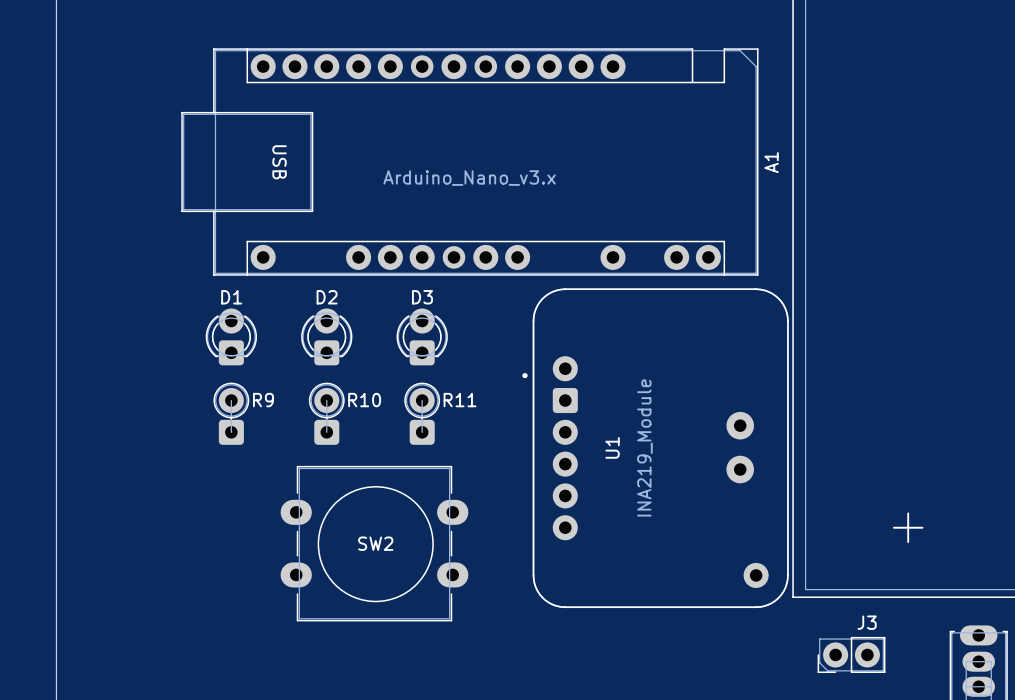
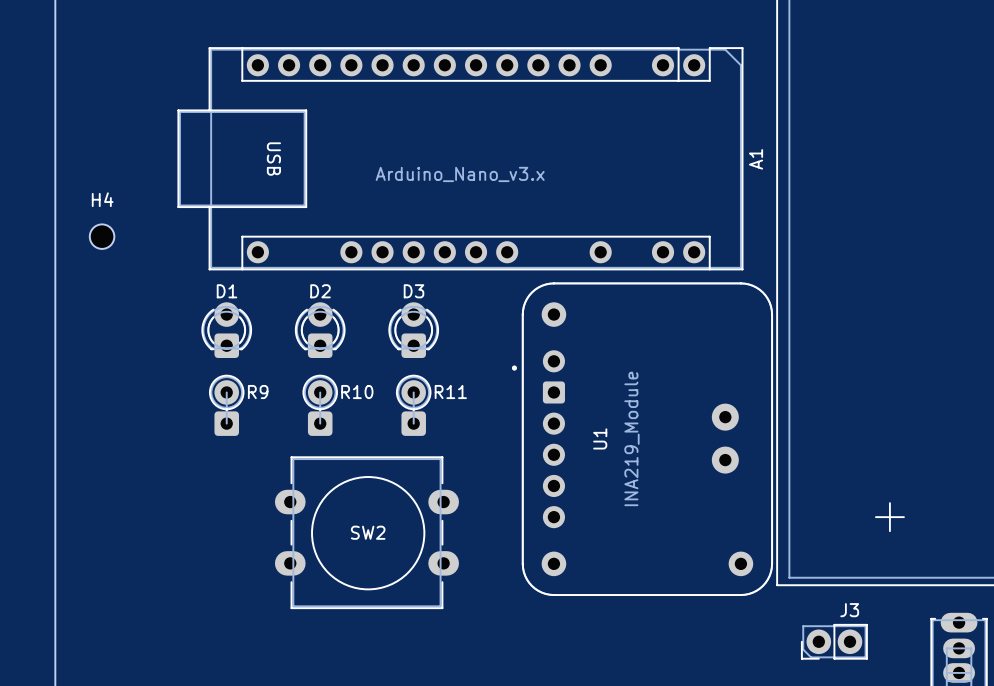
A1 footprint: [181, 48, 759, 276] -> [177, 47, 744, 271]
H4: none -> (102, 236)
U1 footprint: [522, 288, 789, 609] -> [511, 282, 773, 596]

